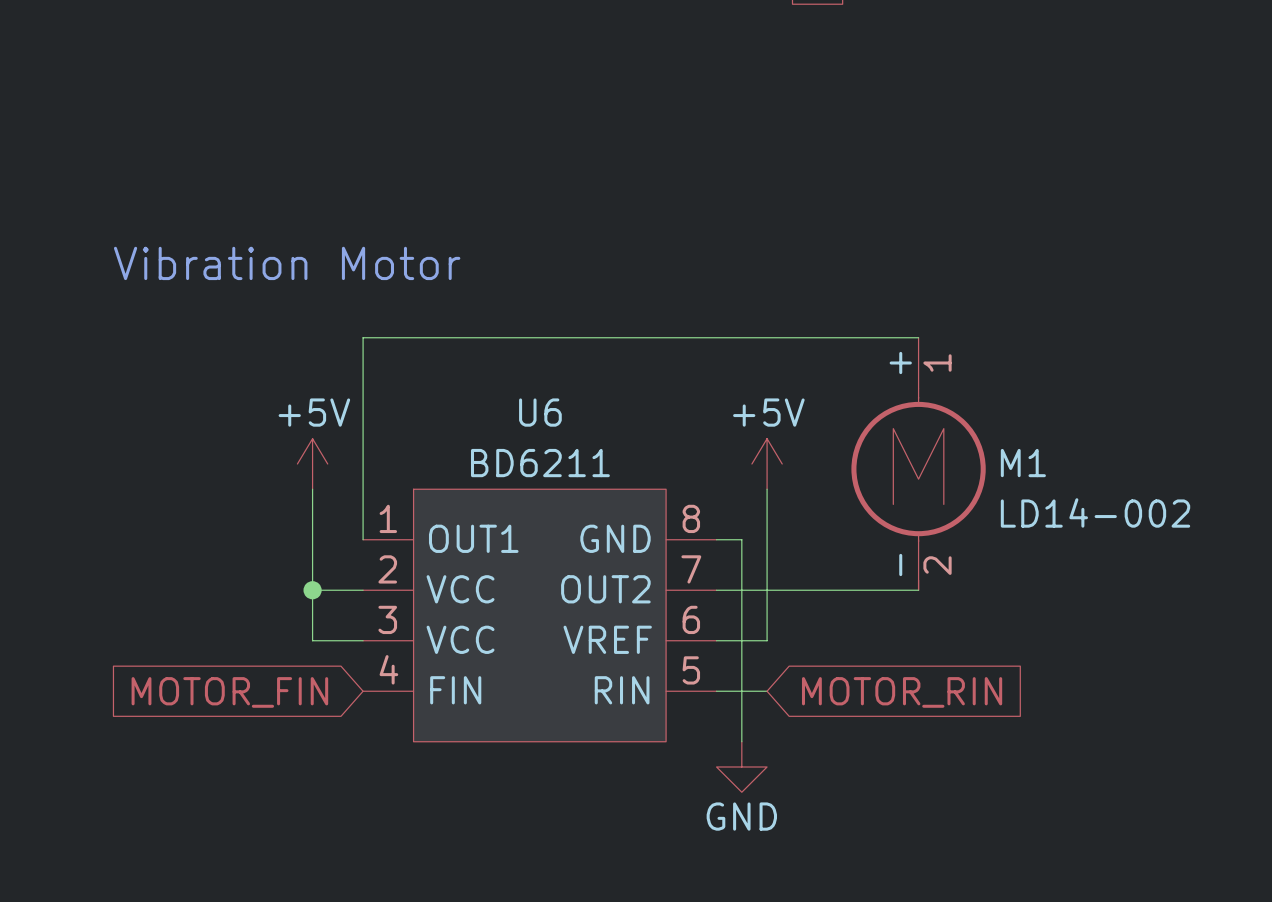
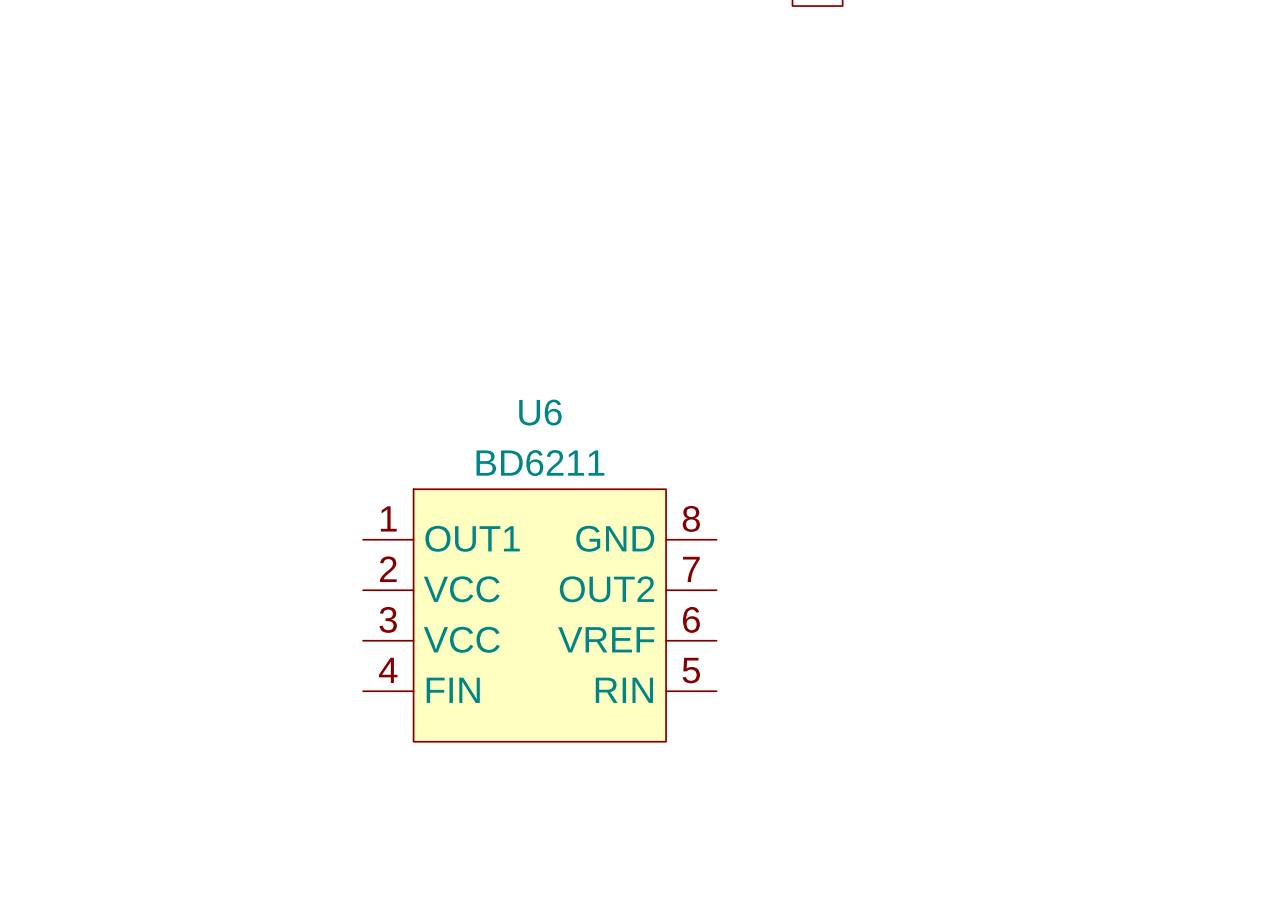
text: Vibration Motor (287, 263) -> none
wire: (918, 337) (363, 337) (363, 539) -> none
power symbol: +5V (312, 463) -> none
power symbol: +5V (767, 463) -> none
M1: LD14-002 (918, 463) -> none
wire: (312, 489) (312, 640) (363, 640) -> none
wire: (767, 489) (767, 640) (716, 640) -> none
wire: (716, 539) (741, 539) (741, 741) -> none
wire: (312, 590) (363, 590) -> none
junction: (312, 590) -> none
wire: (716, 590) (918, 590) -> none
wire: (716, 691) (767, 691) -> none
global label: MOTOR_FIN (229, 692) -> none
global label: MOTOR_RIN (902, 692) -> none
power symbol: GND (741, 766) -> none

